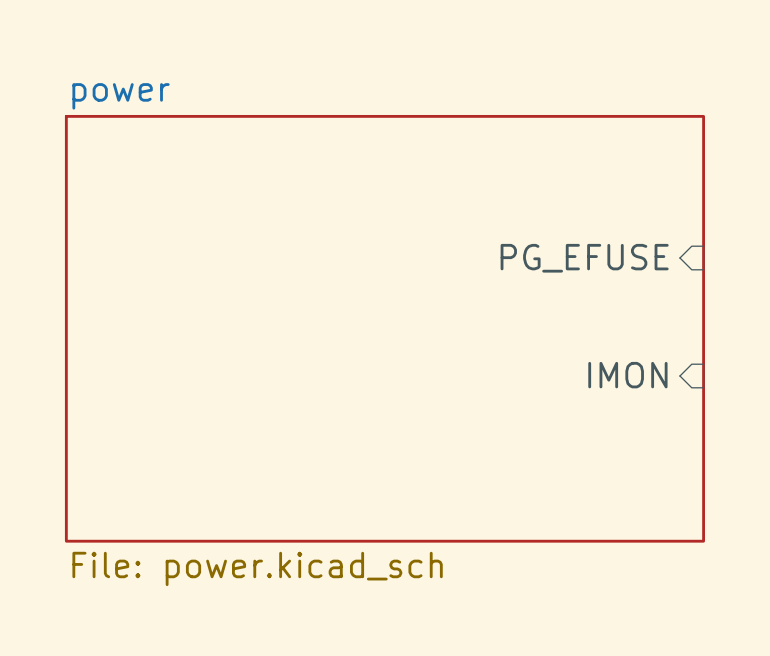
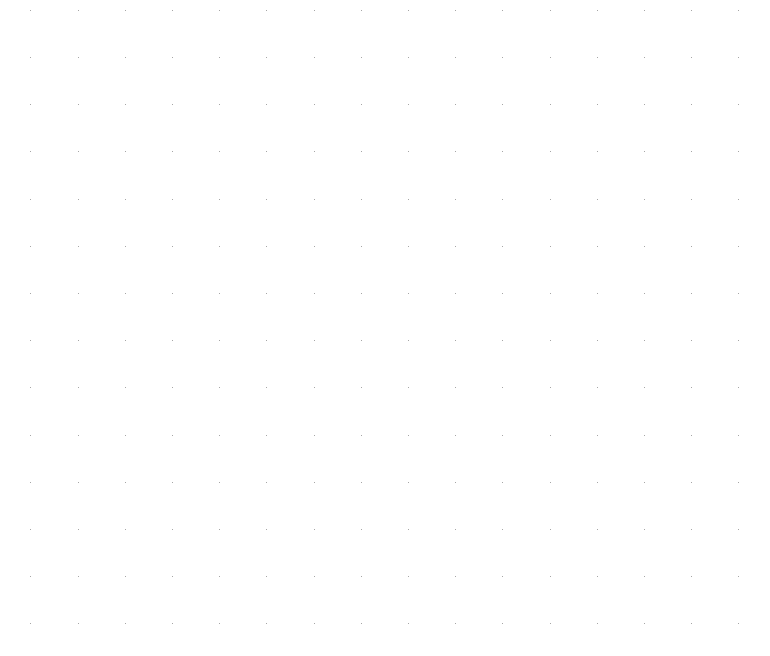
sheet pin: PG_EFUSE (584, 258) -> none
sheet power: File: power.kicad_sch (384, 328) -> none
sheet pin: IMON (627, 375) -> none

